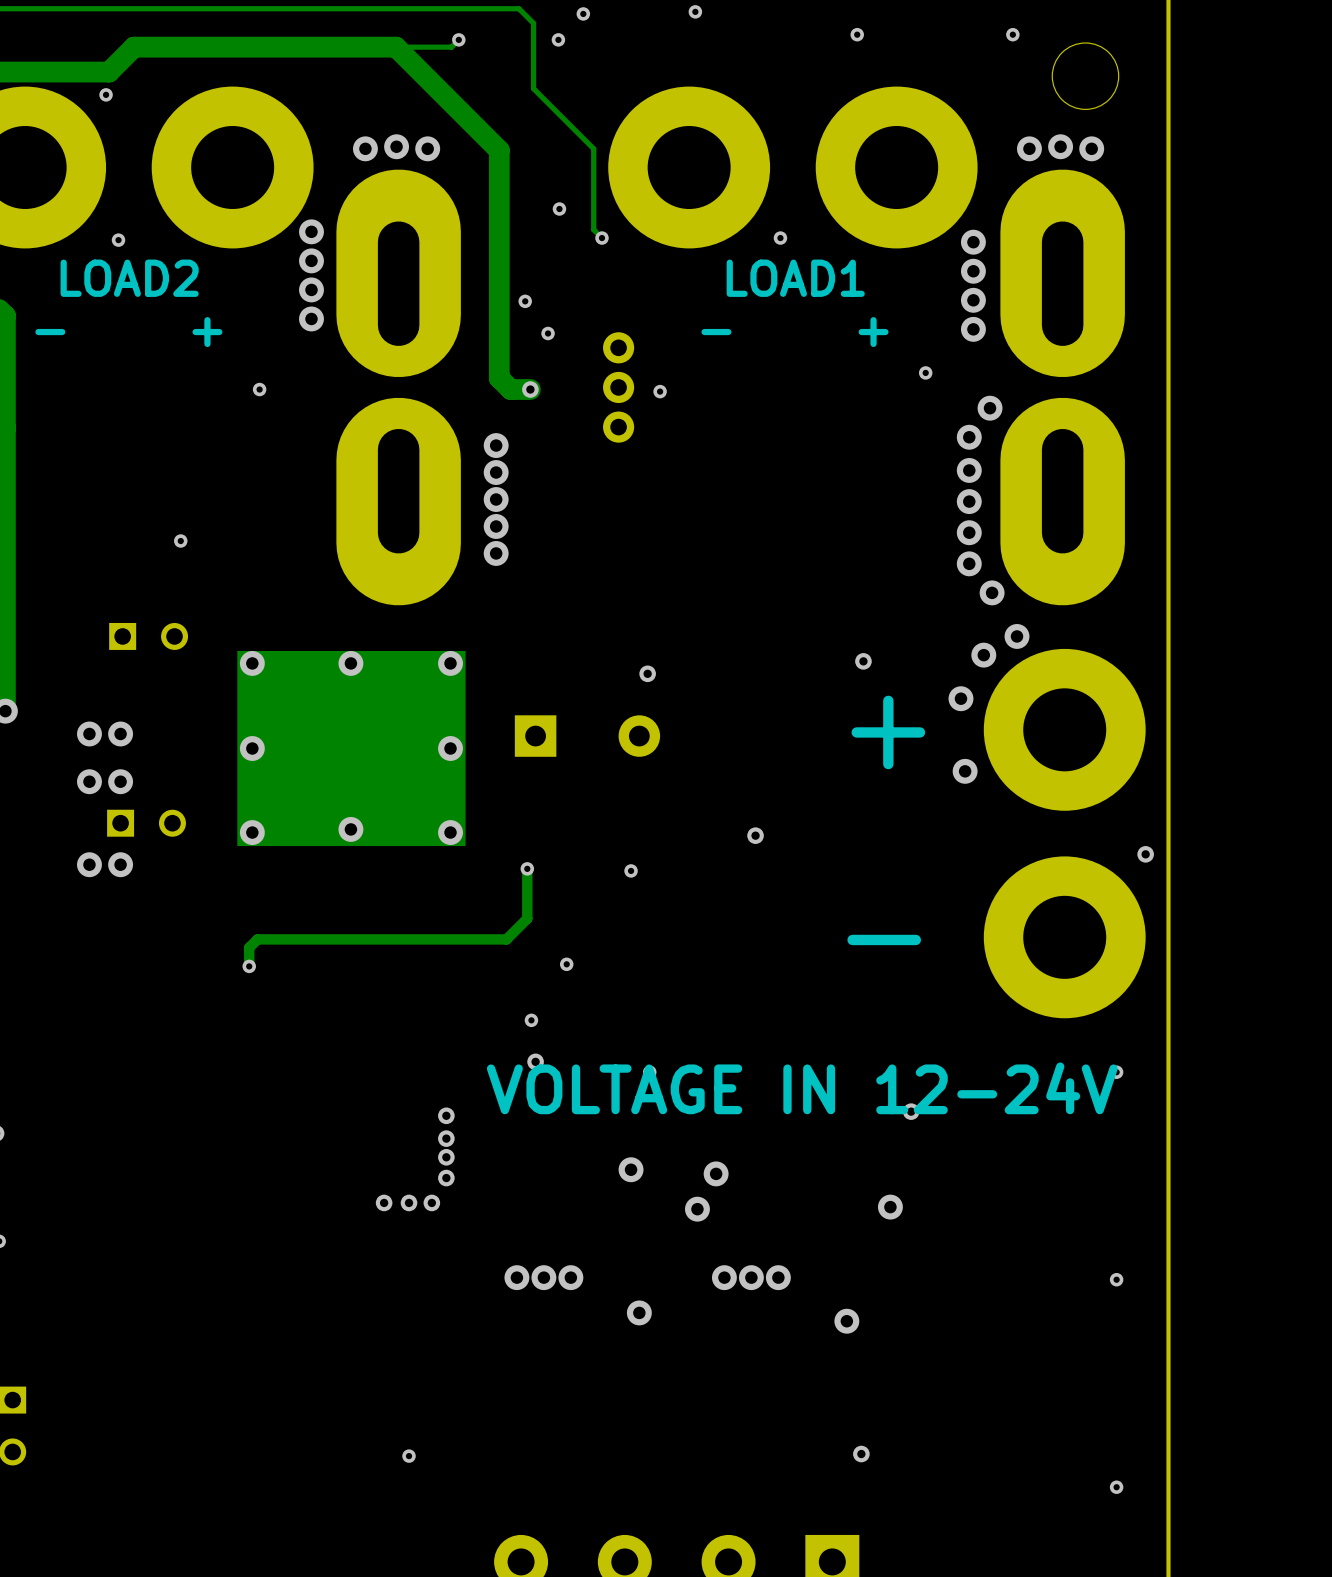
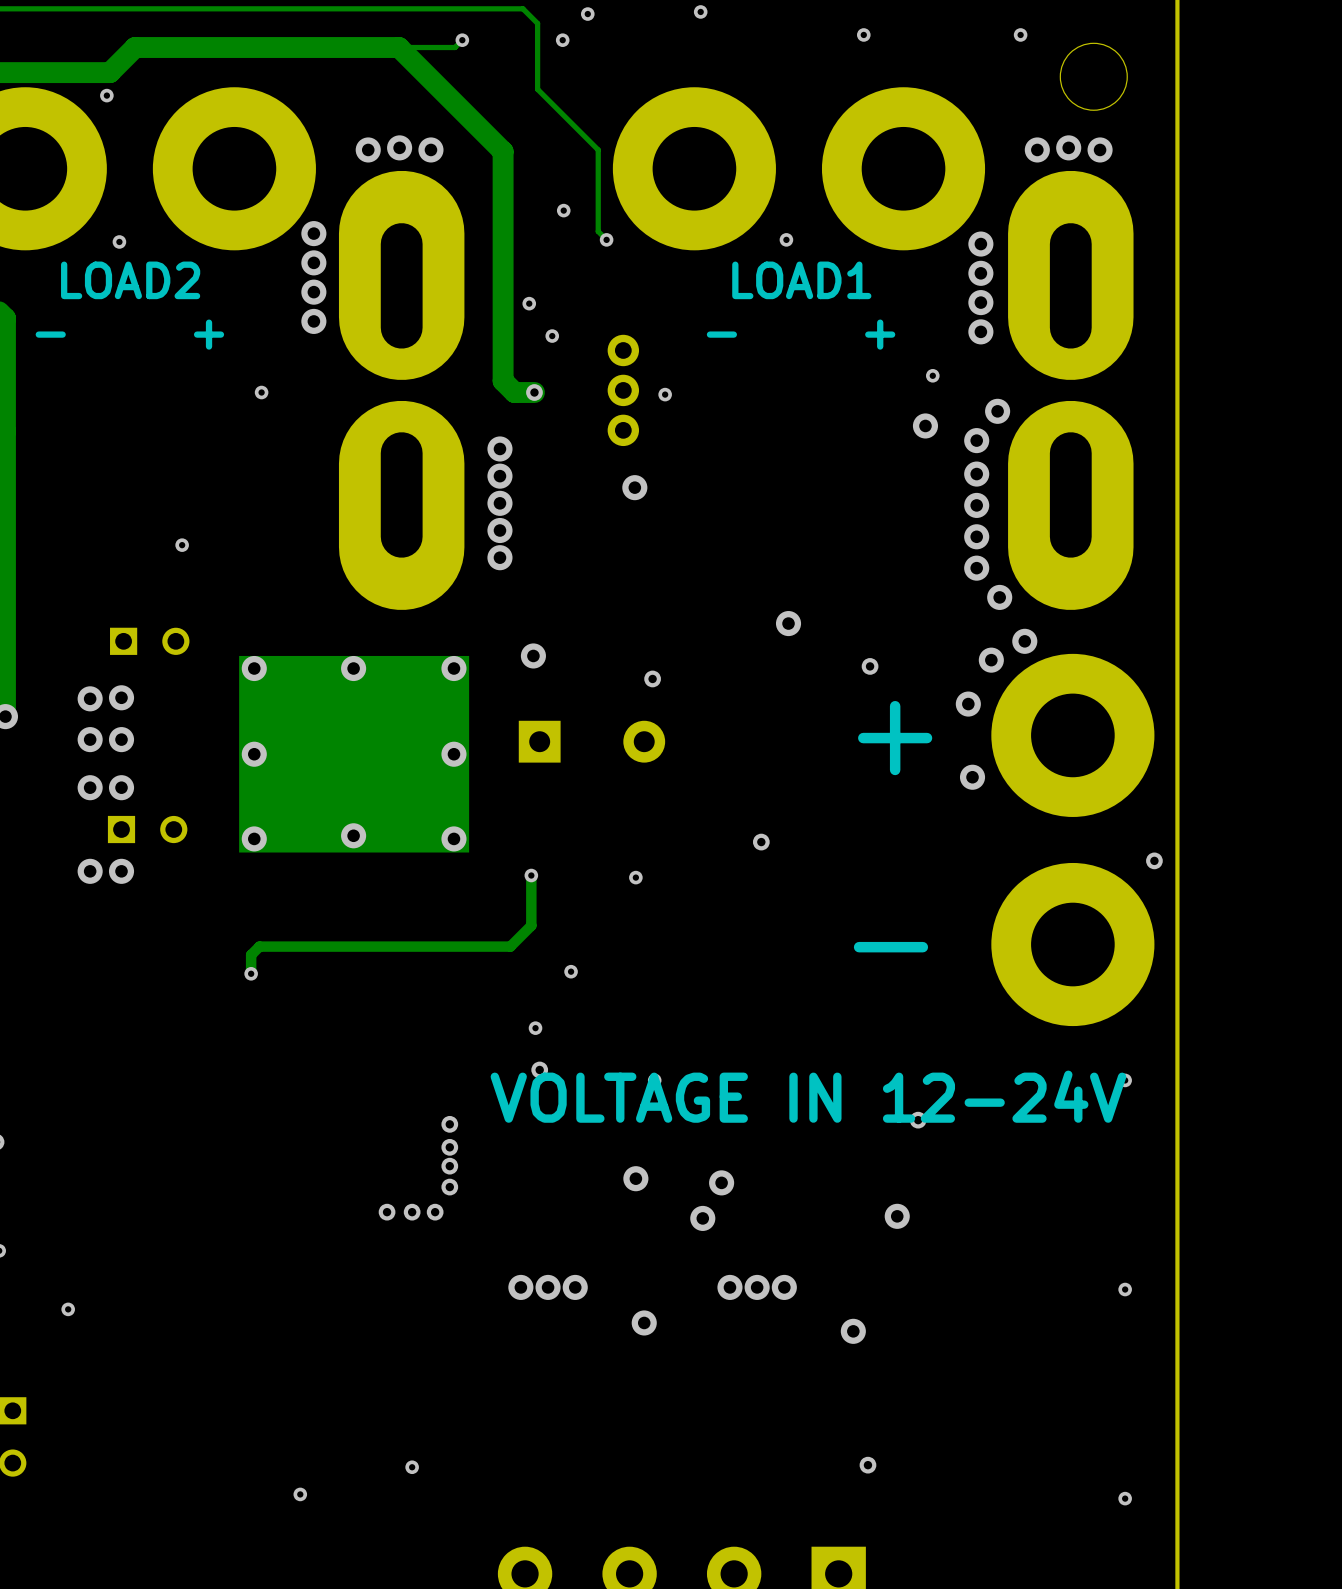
via: none -> (925, 425)
via: none -> (634, 487)
via: none -> (788, 623)
via: none -> (533, 655)
via: none -> (121, 697)
via: none -> (90, 698)
via: none -> (68, 1309)
via: none -> (300, 1494)

